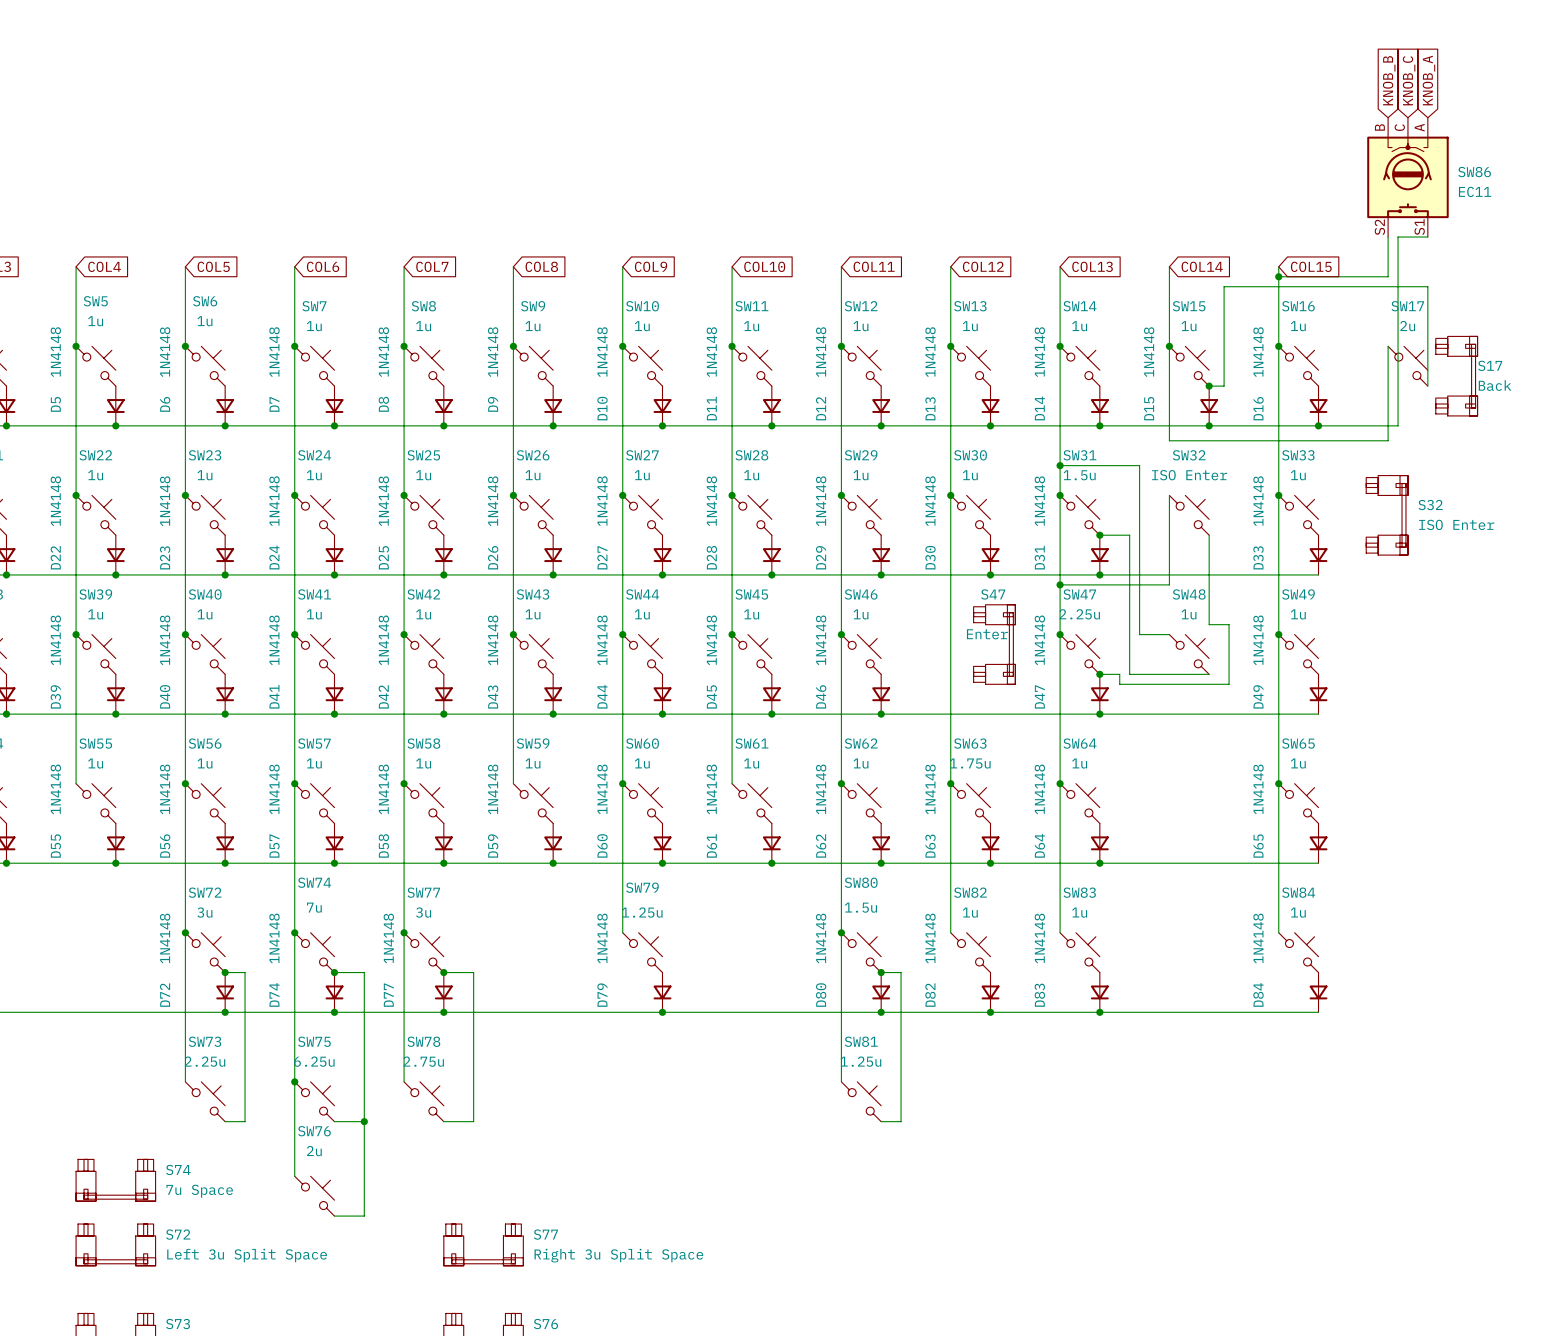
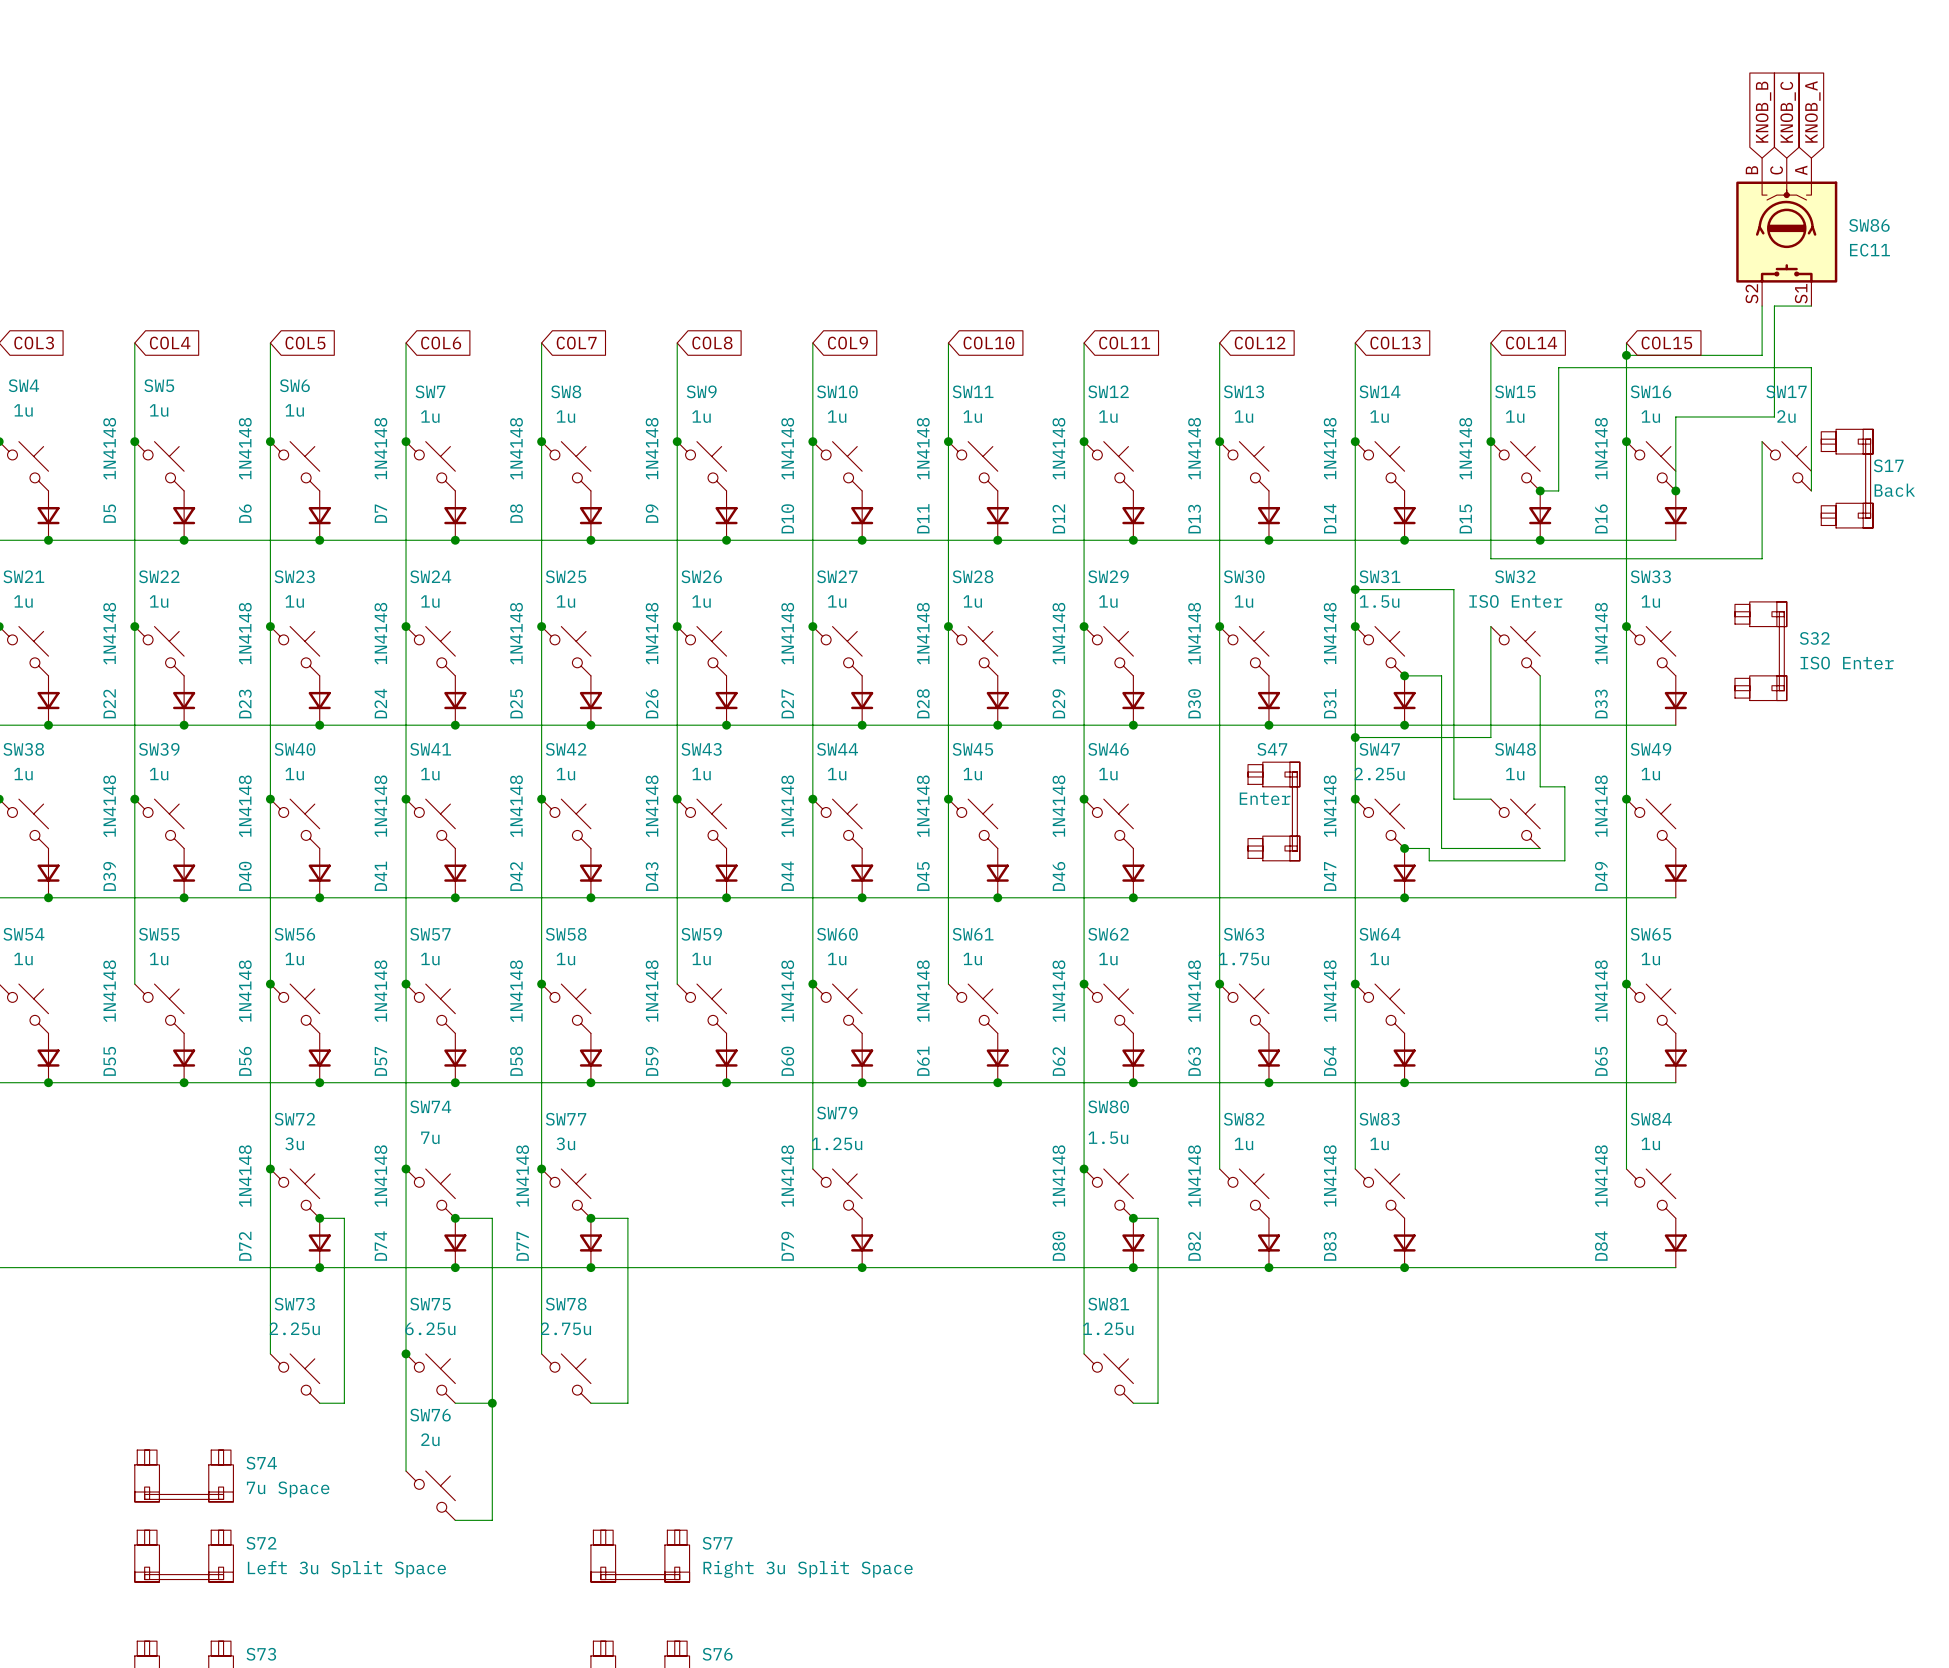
wire: (1398, 326) (1398, 425) (1318, 425) -> (1774, 416) (1675, 416) (1675, 490)
junction position: (1318, 425) -> (1675, 490)

